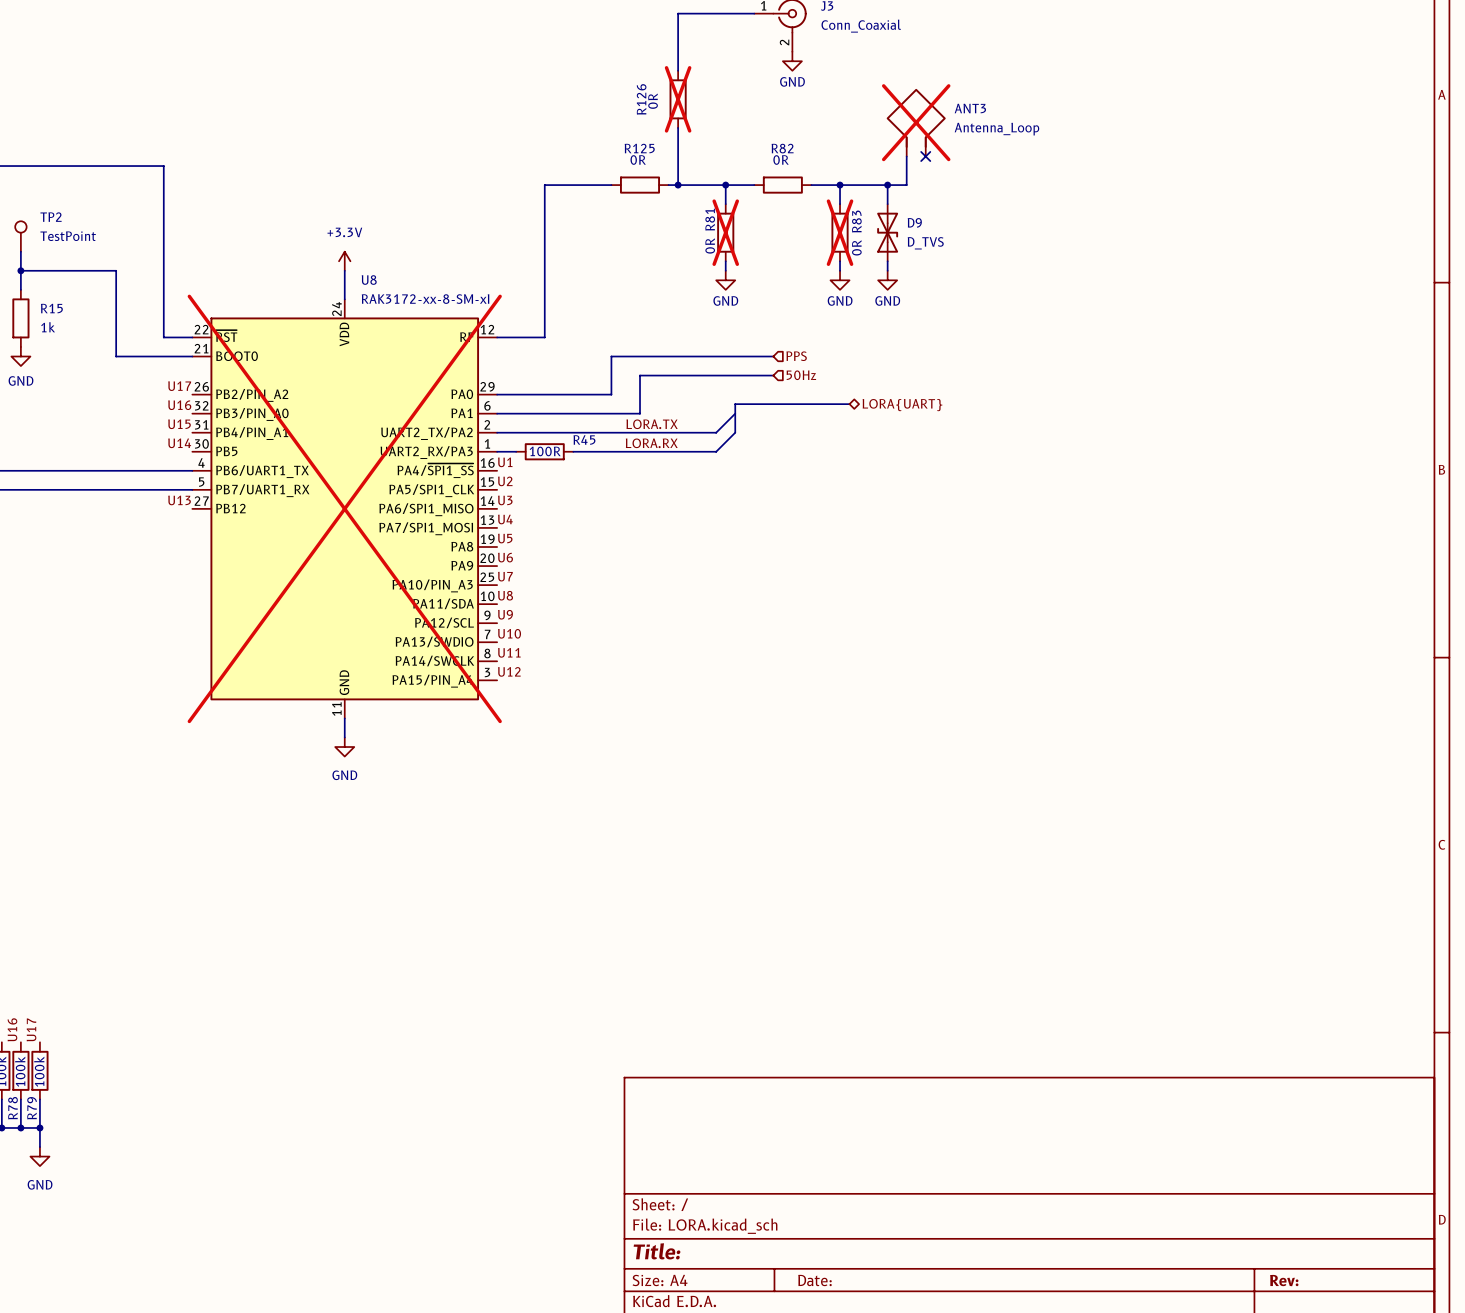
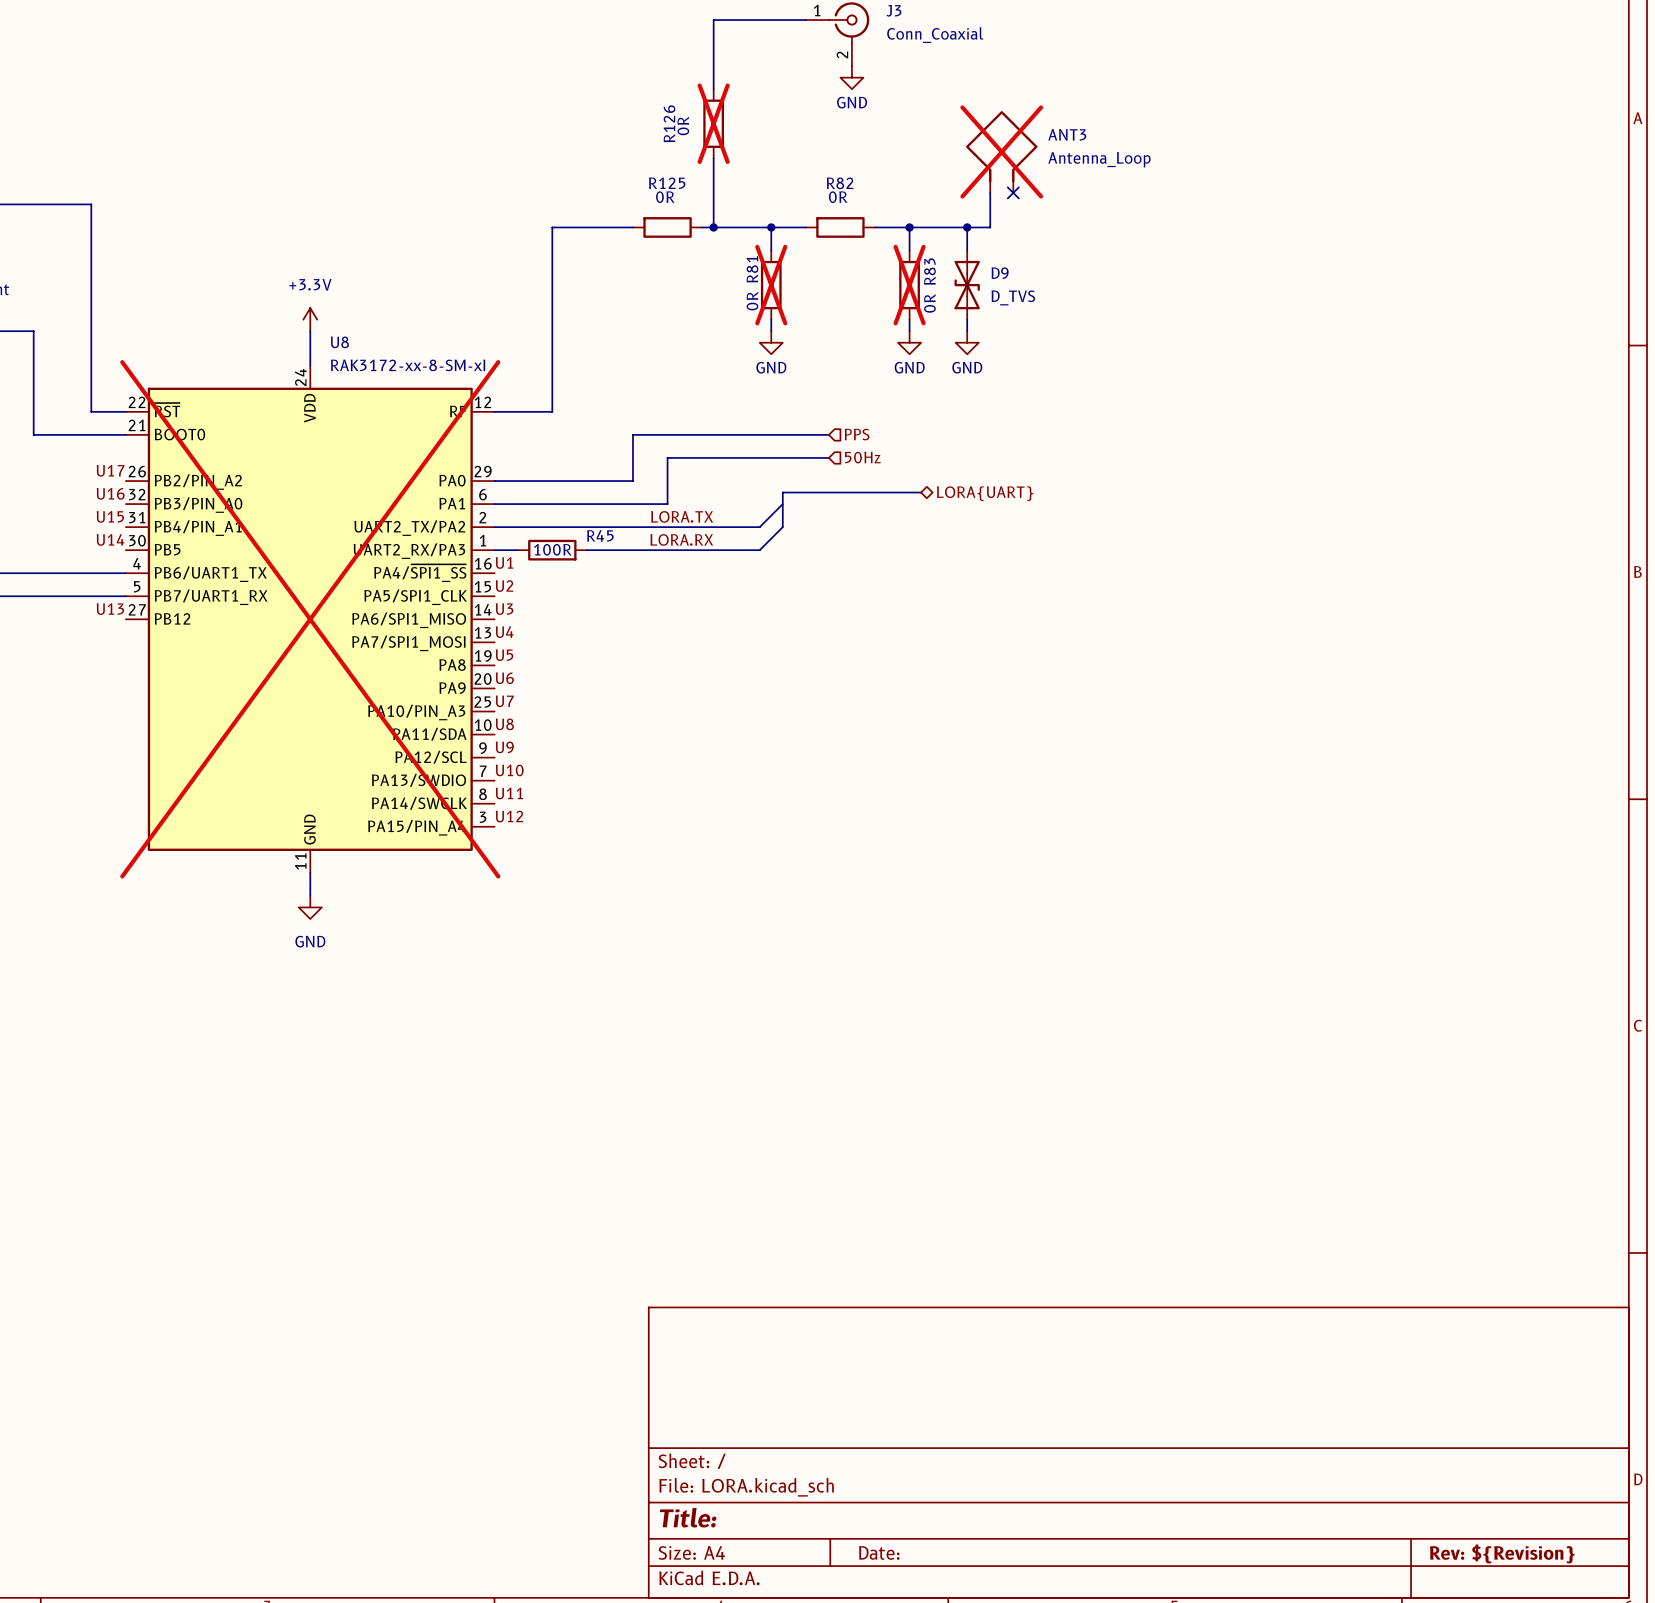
title block: Rev: (1284, 1280) -> Rev: ${Revision} (1502, 1553)

